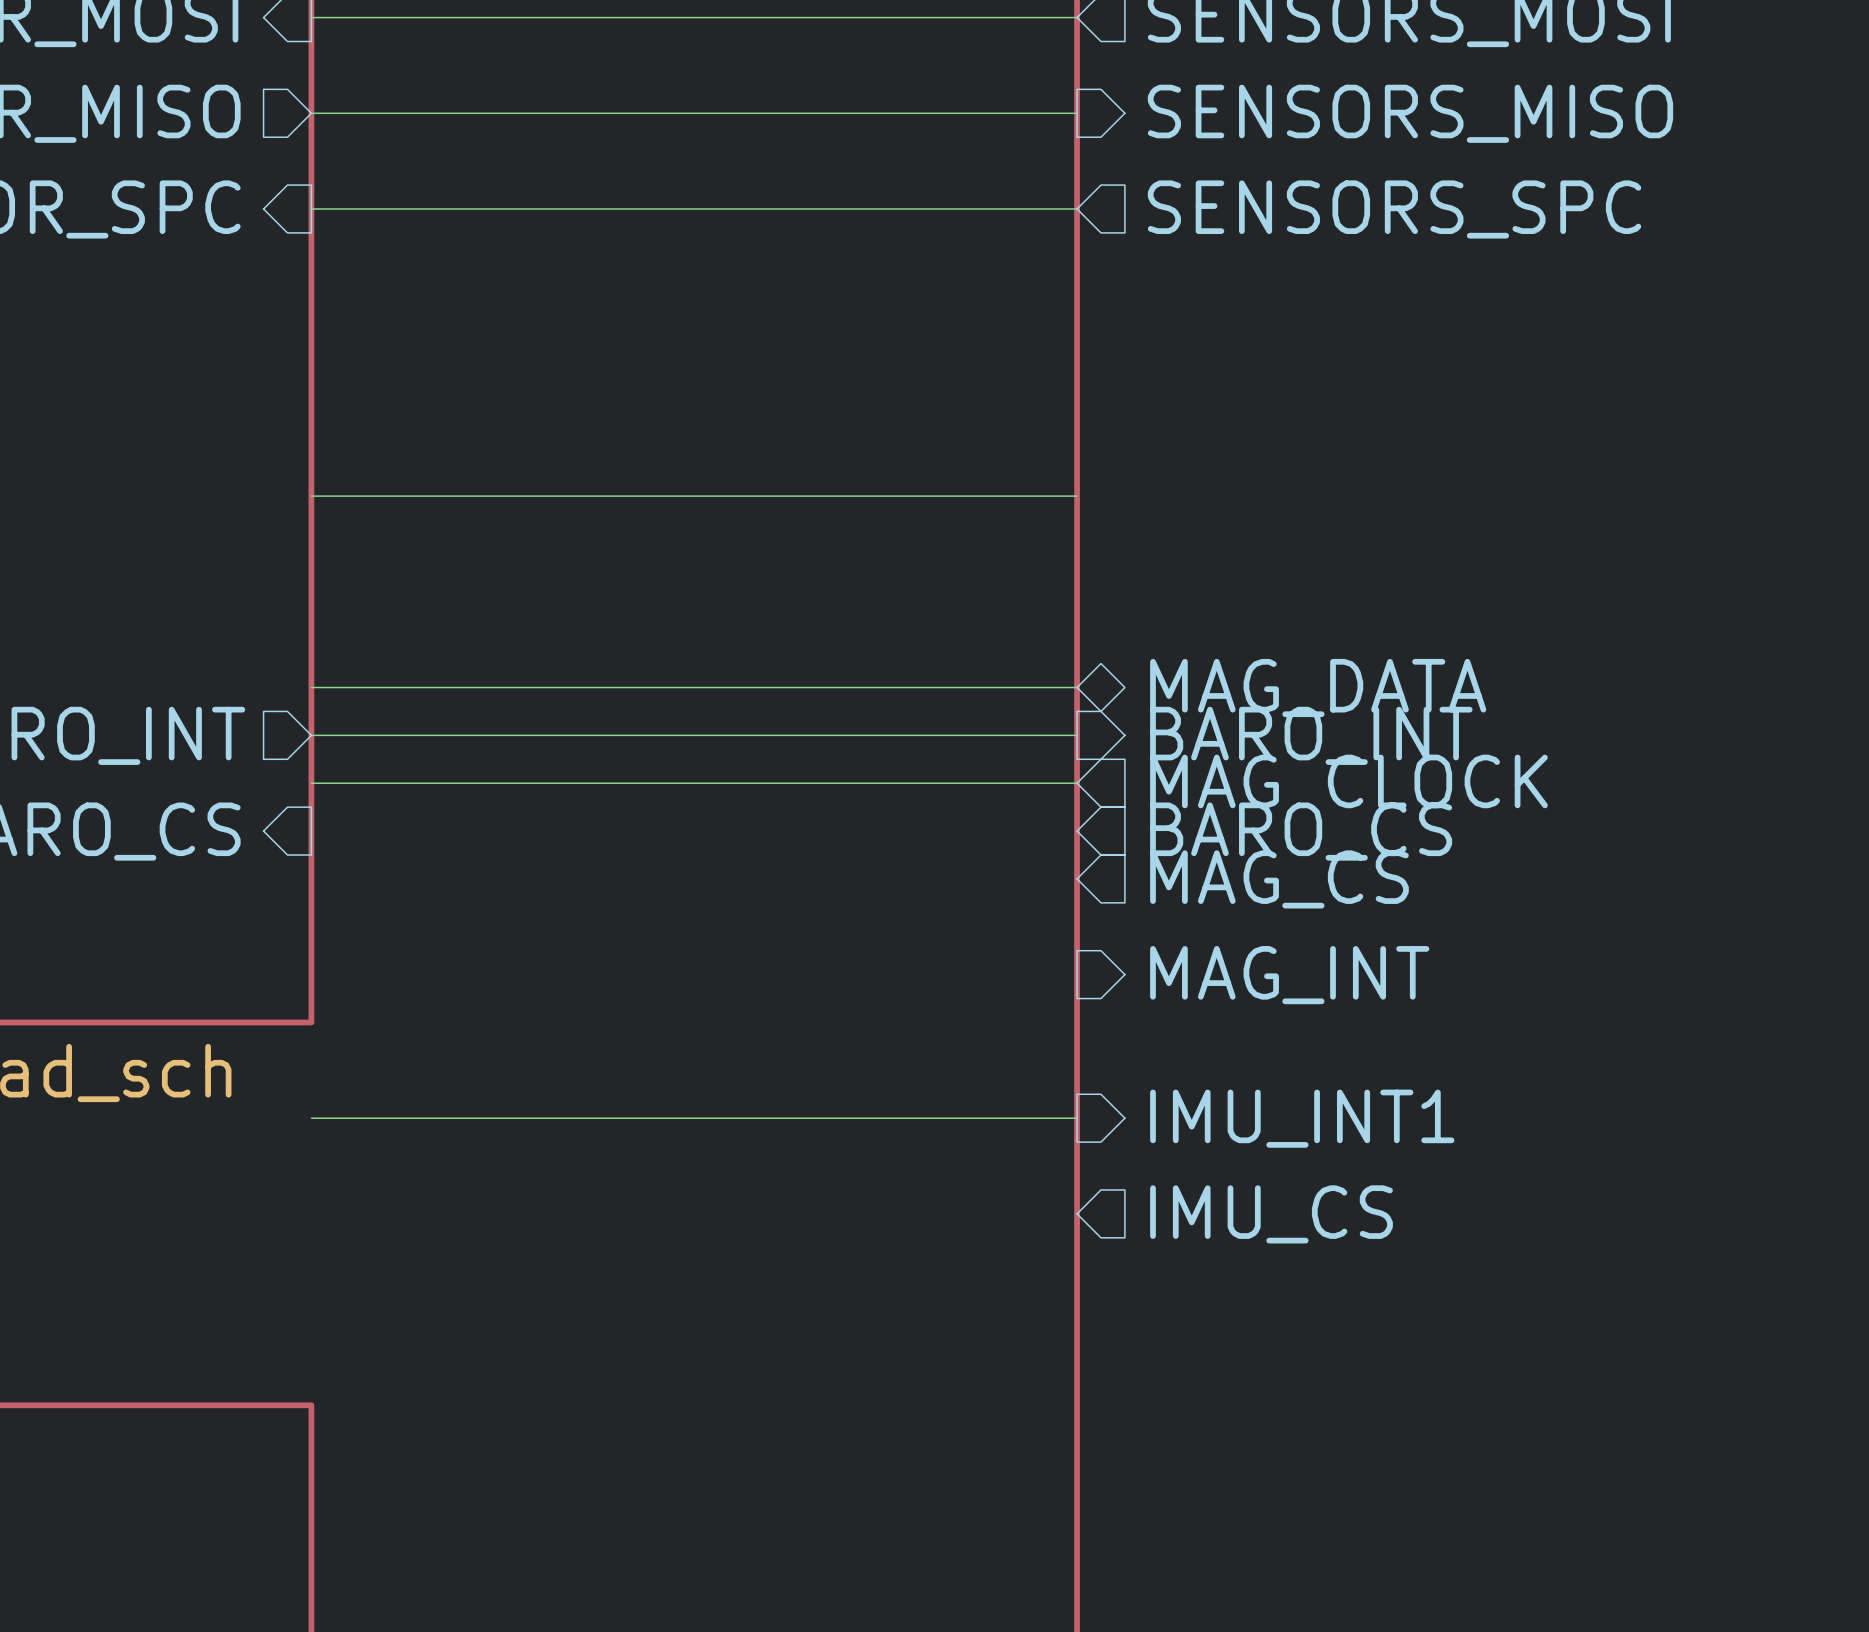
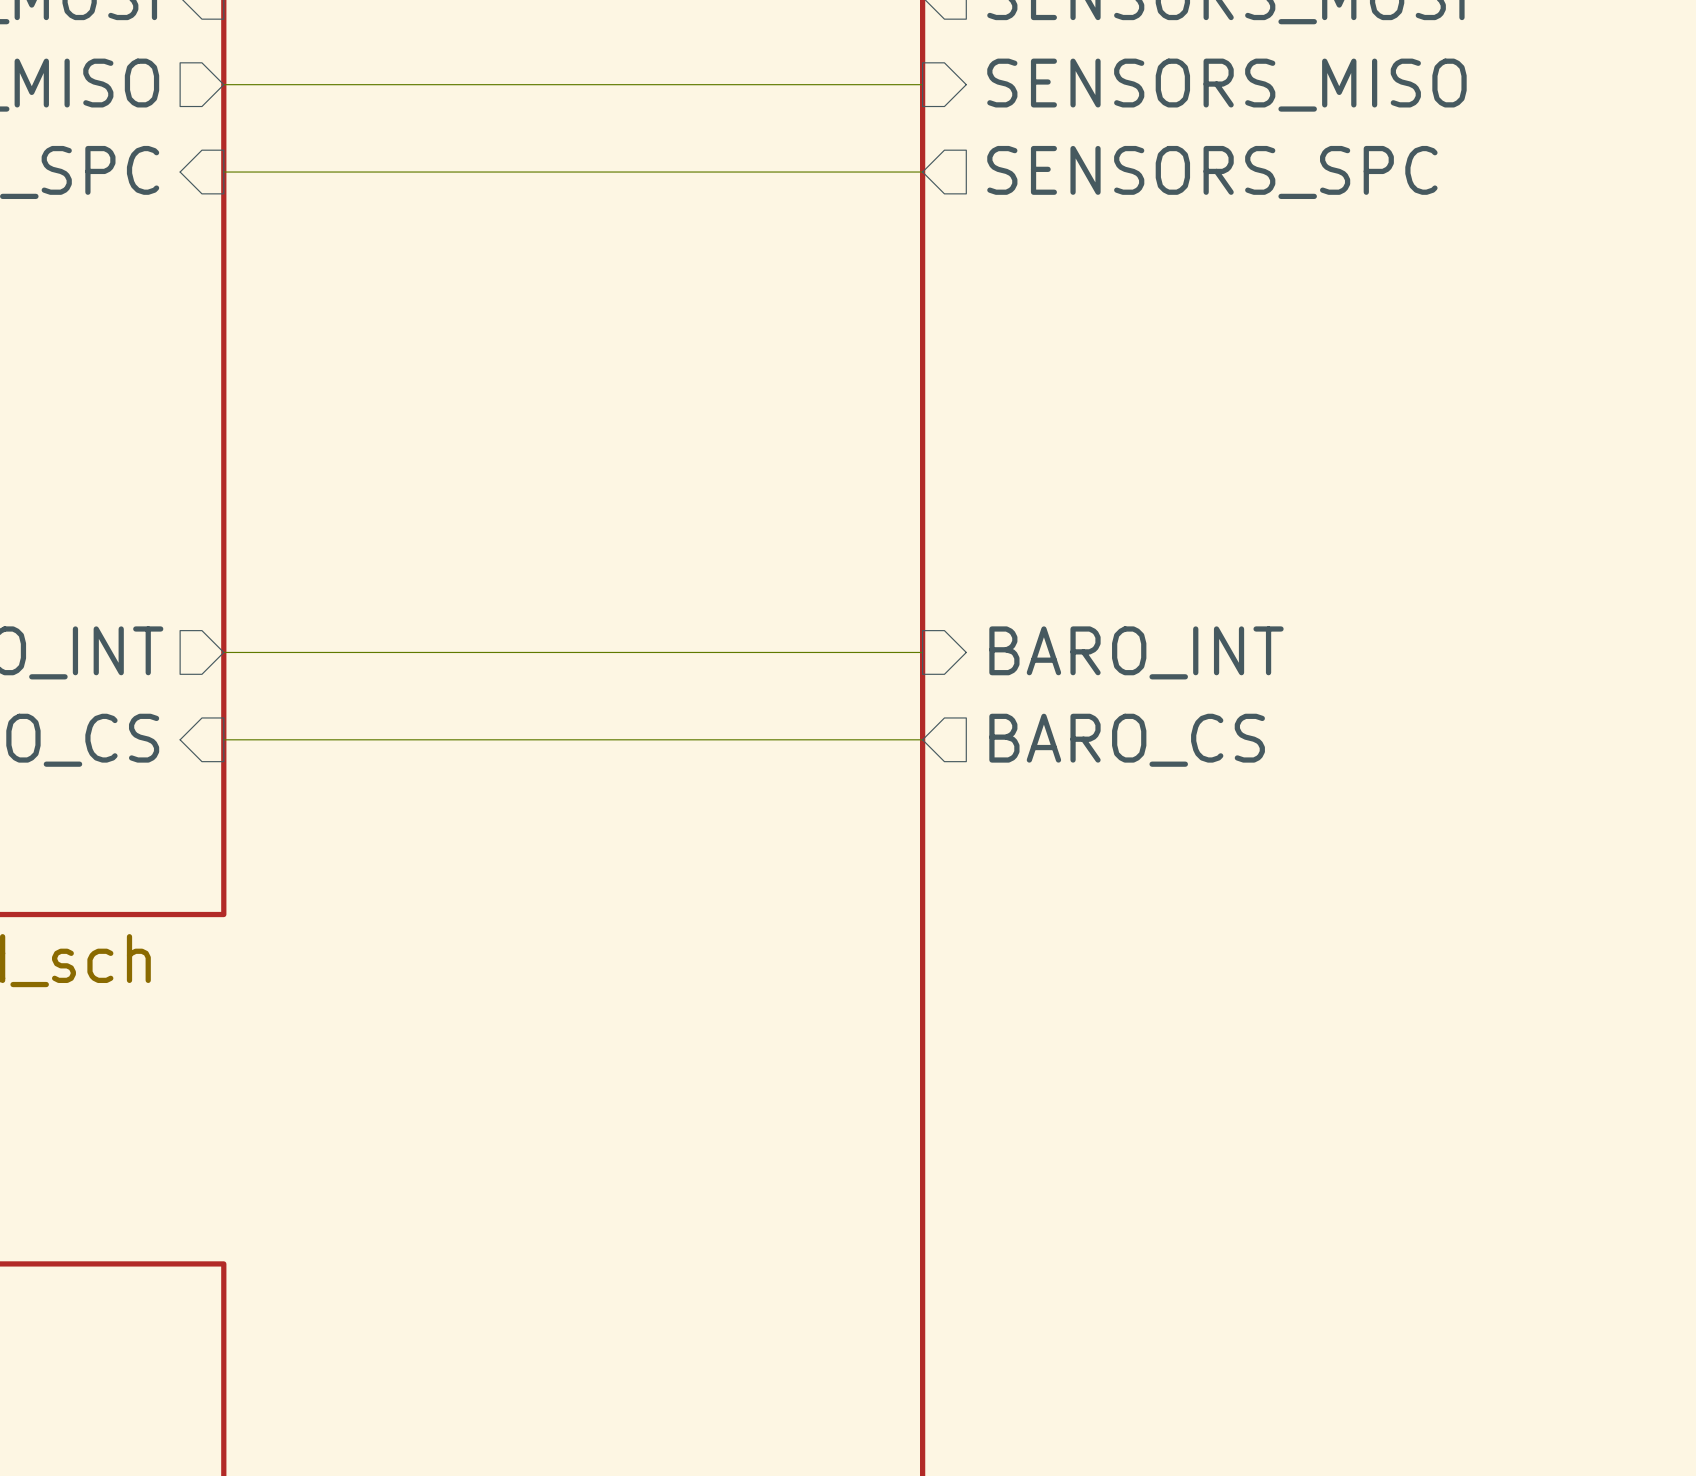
wire: (311, 496) (1077, 496) -> none
wire: (311, 687) (1077, 687) -> none
sheet pin: MAG_DATA (1318, 688) -> none
sheet pin: MAG CLOCK (1348, 781) -> none
wire: (311, 783) (1077, 783) -> (223, 739) (922, 739)
sheet pin: MAG_CS (1279, 879) -> none
sheet pin: MAG_INT (1289, 975) -> none
wire: (311, 1118) (1077, 1118) -> none
sheet pin: IMU_INT1 (1302, 1118) -> none
sheet pin: IMU_CS (1271, 1214) -> none

